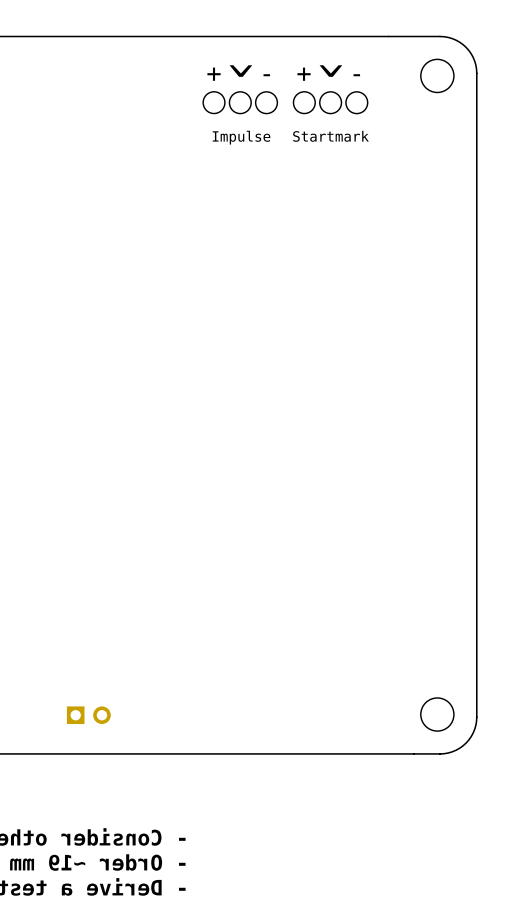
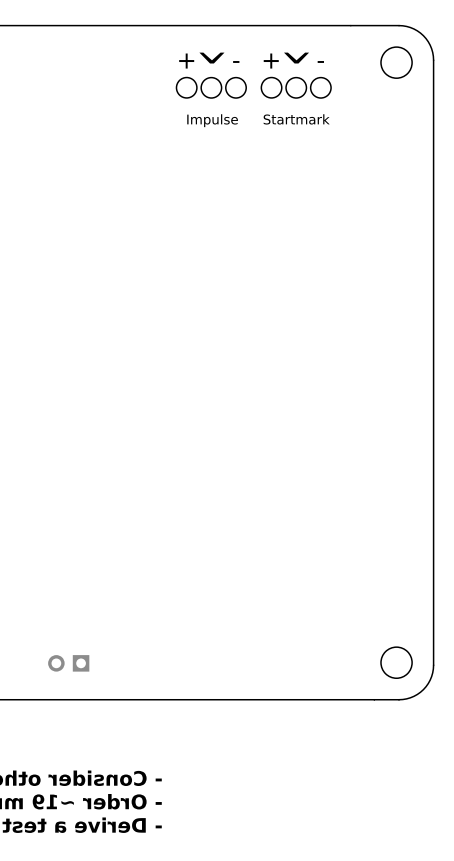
part rotation: 0° (88, 715) -> 180° (68, 663)

